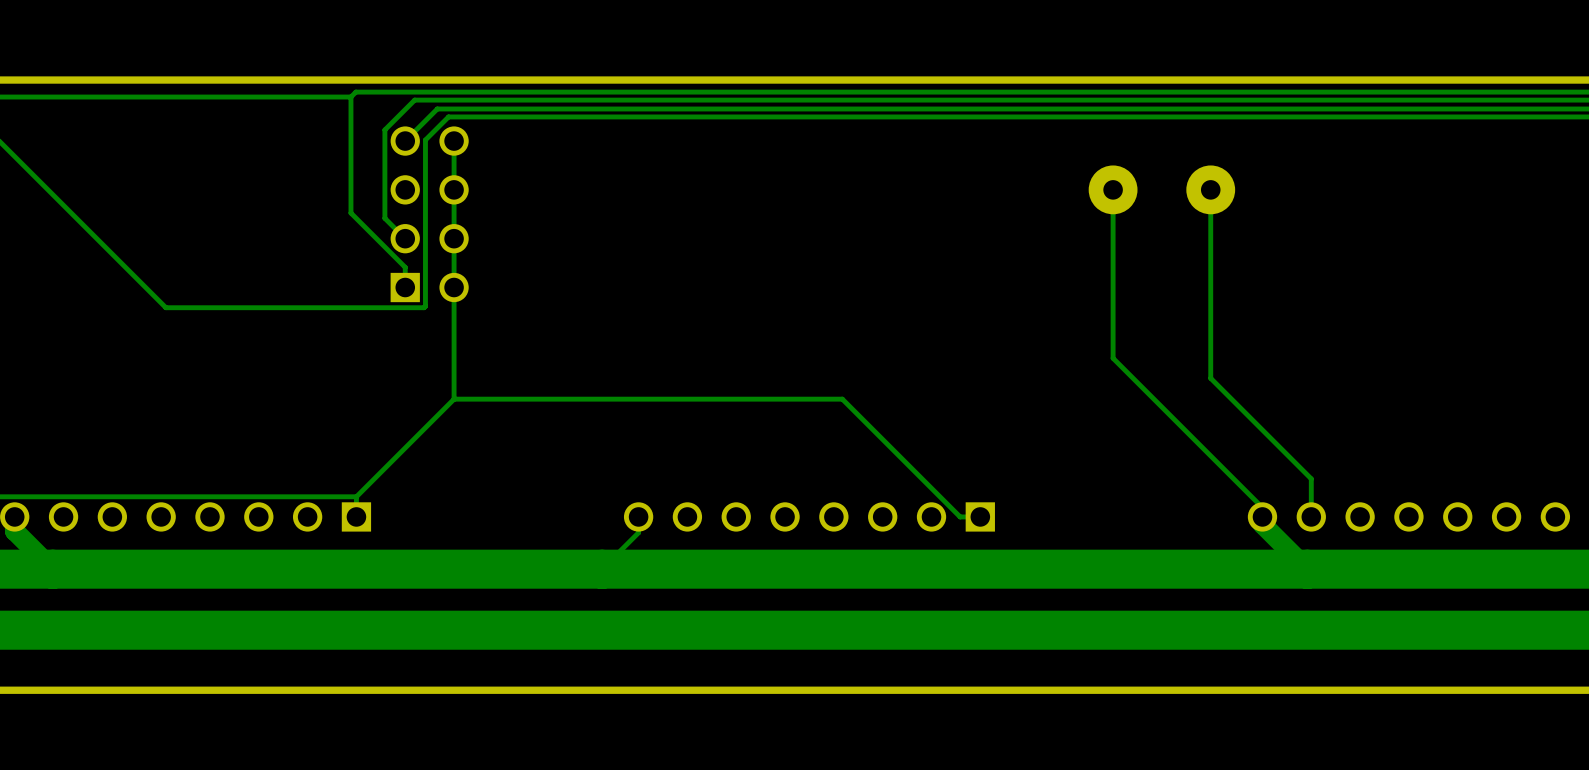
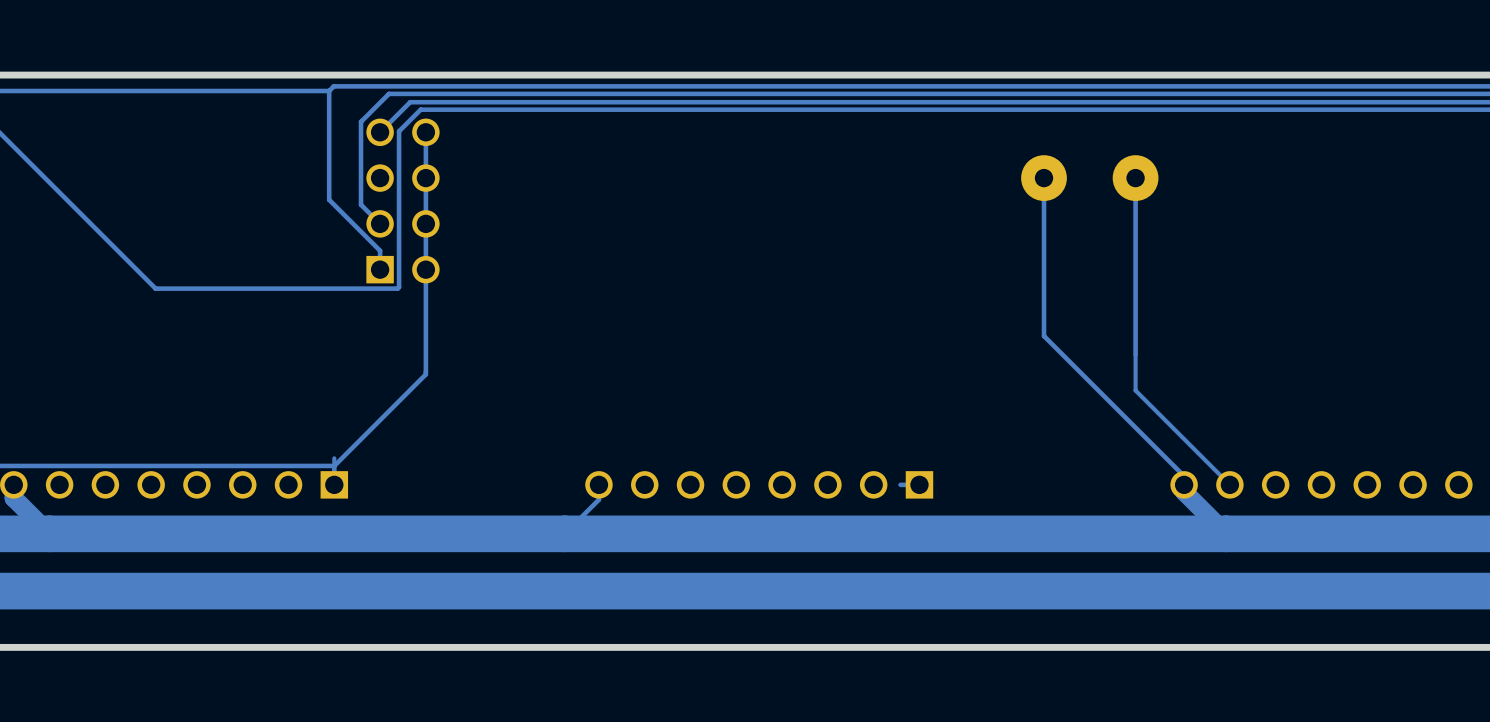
track: (1210, 378) (1311, 478) (1311, 516) -> (1135, 354) (1135, 390) (1229, 484)
track: (454, 399) (842, 399) (960, 516) -> none
track: none -> (334, 458) (334, 465)

